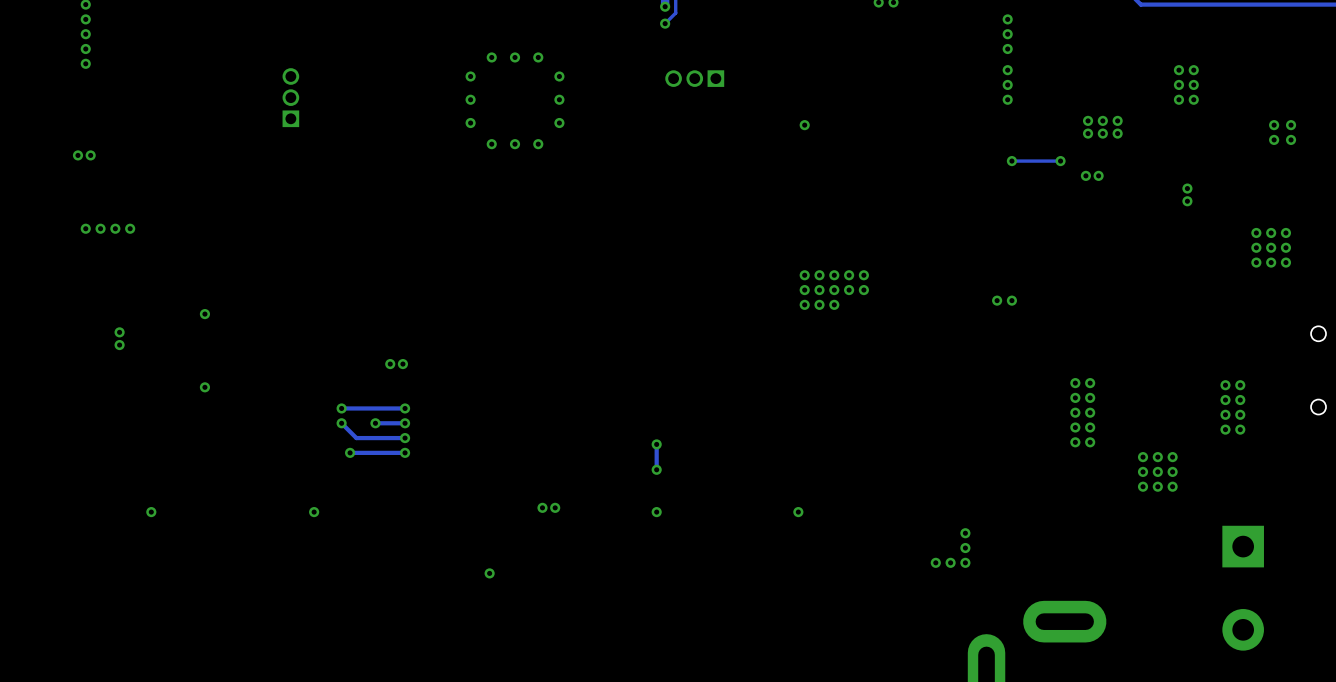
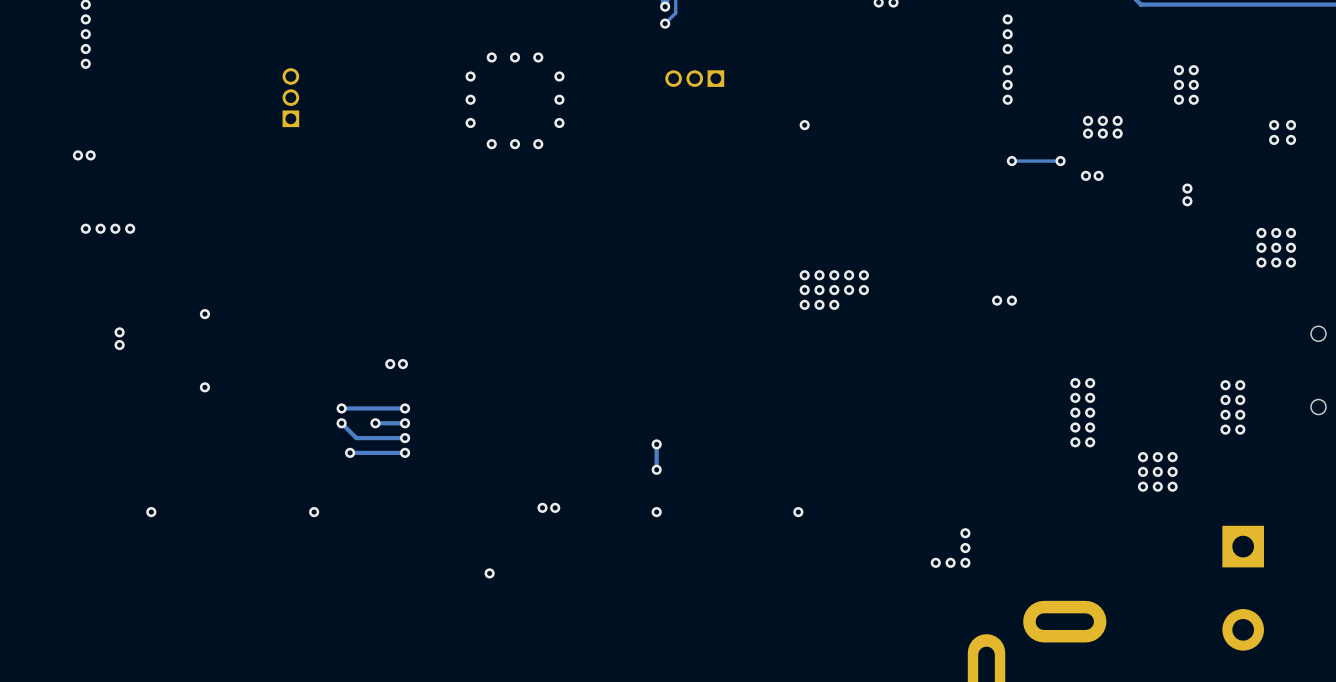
via: (1256, 232) -> none
via: none -> (1261, 232)
via: (1271, 232) -> none
via: none -> (1276, 232)
via: (1285, 232) -> none
via: none -> (1291, 232)
via: (1256, 247) -> none
via: none -> (1261, 247)
via: (1271, 247) -> none
via: none -> (1276, 247)
via: (1285, 247) -> none
via: none -> (1291, 247)
via: (1256, 262) -> none
via: none -> (1261, 262)
via: (1271, 262) -> none
via: none -> (1276, 262)
via: (1285, 262) -> none
via: none -> (1291, 262)

